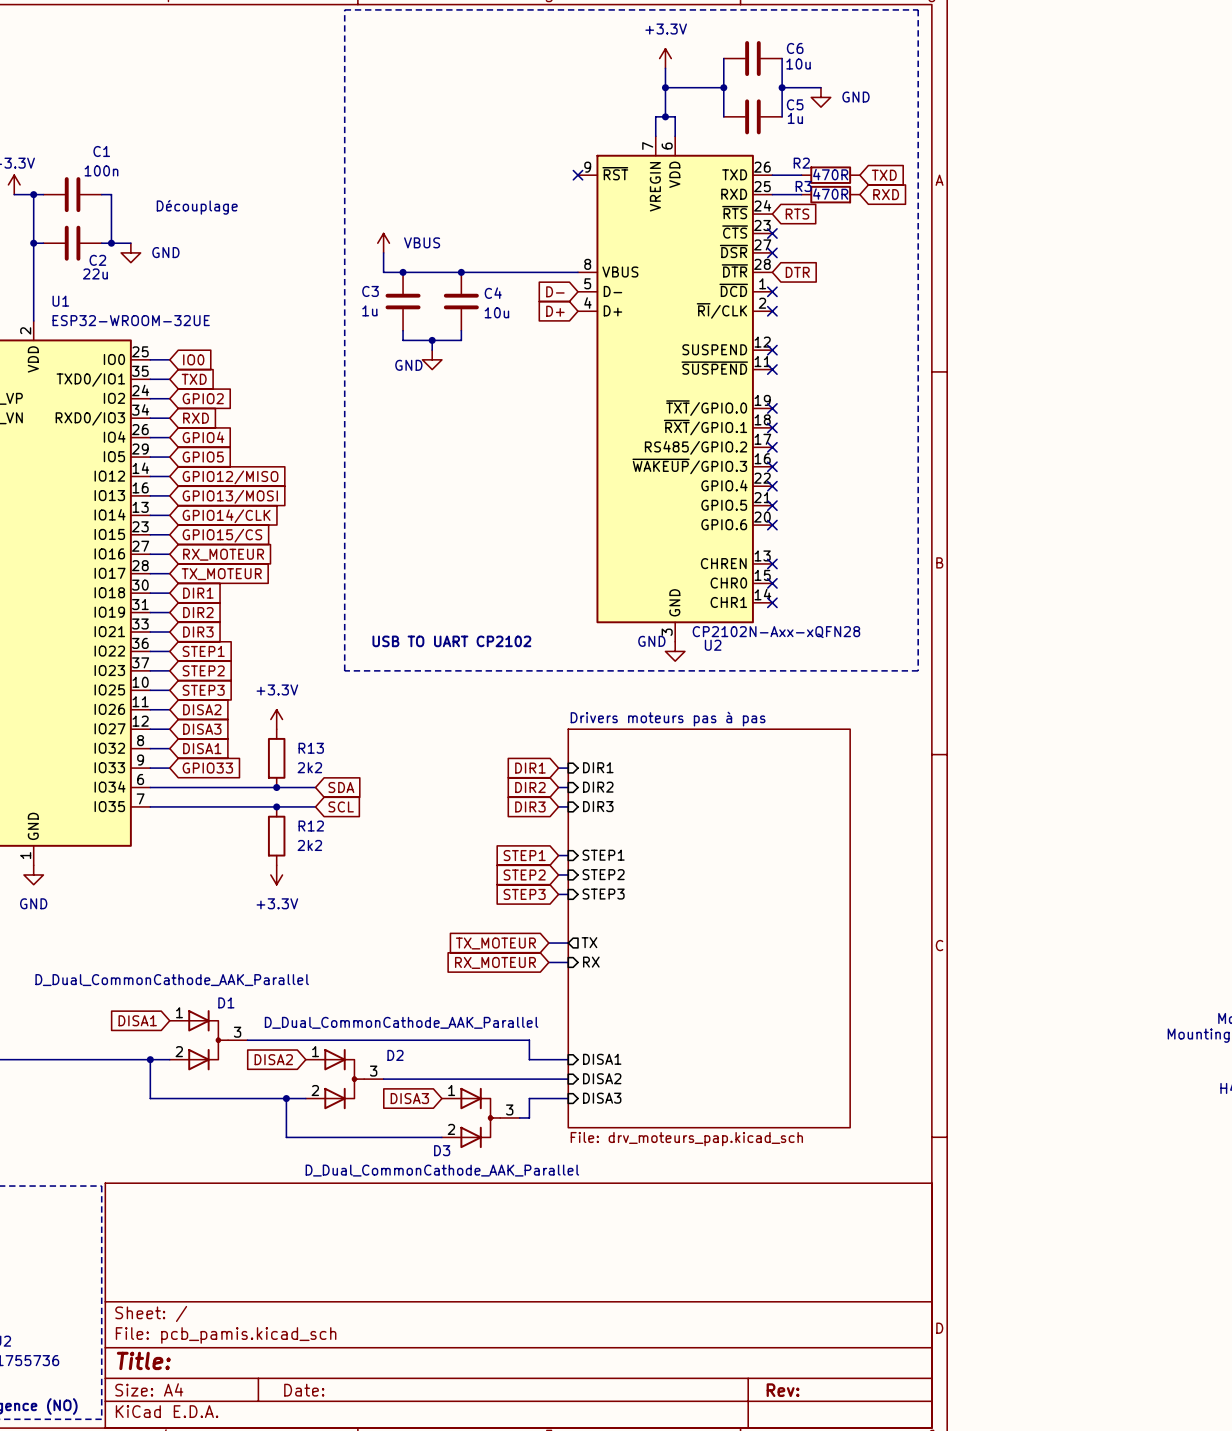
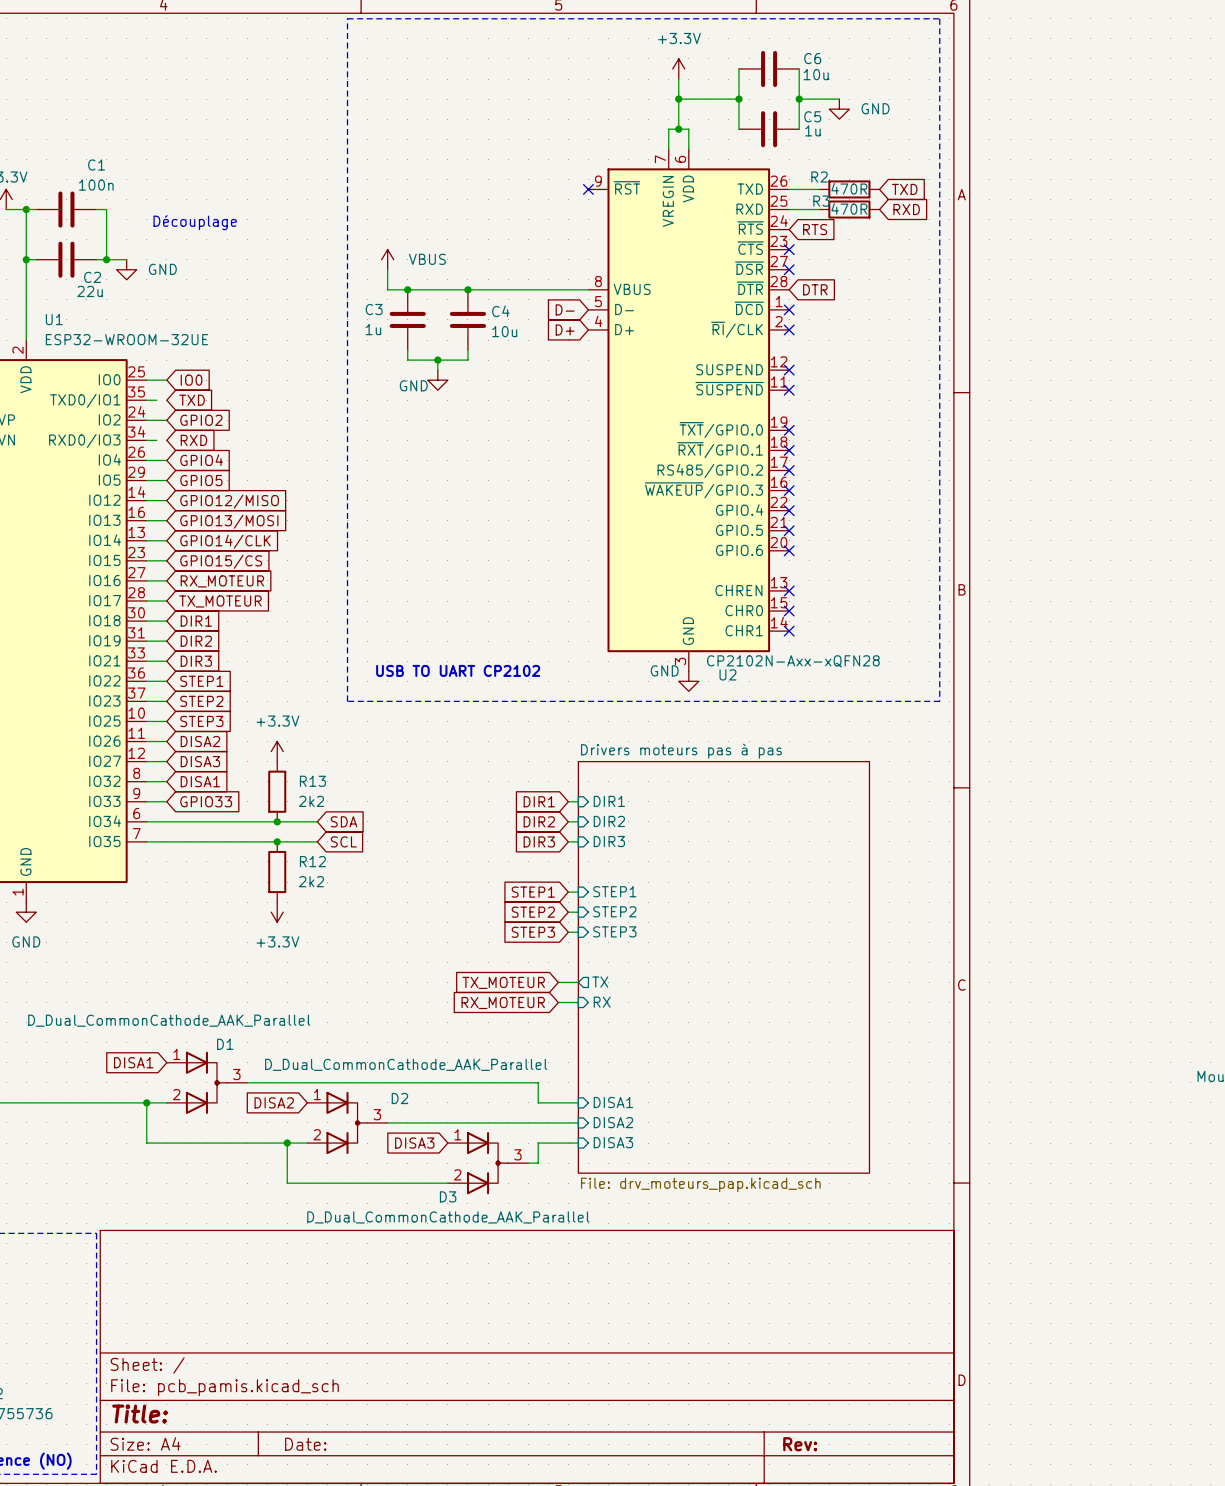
wire: (160, 379) (169, 379) -> none
wire: (160, 418) (169, 418) -> none

